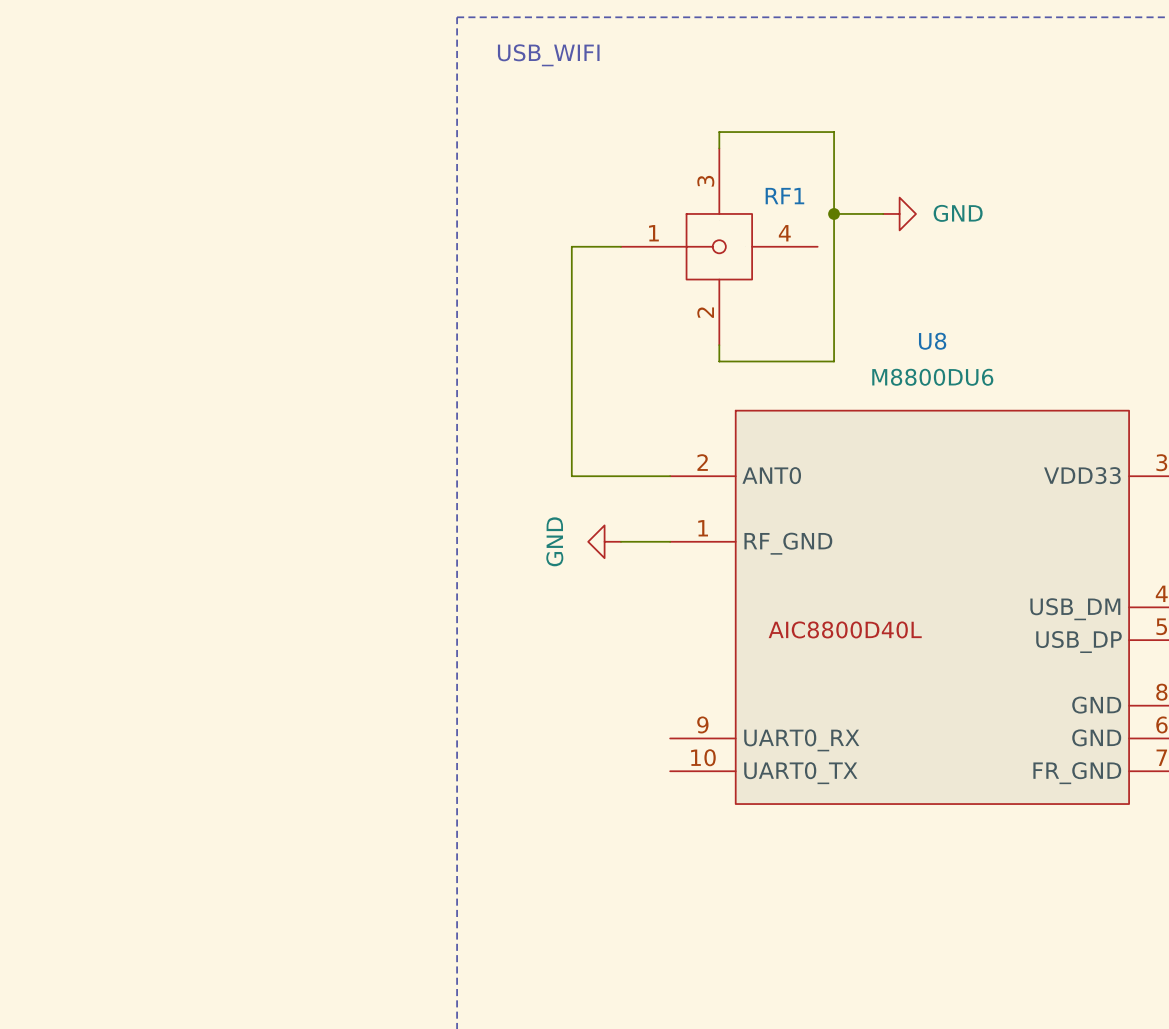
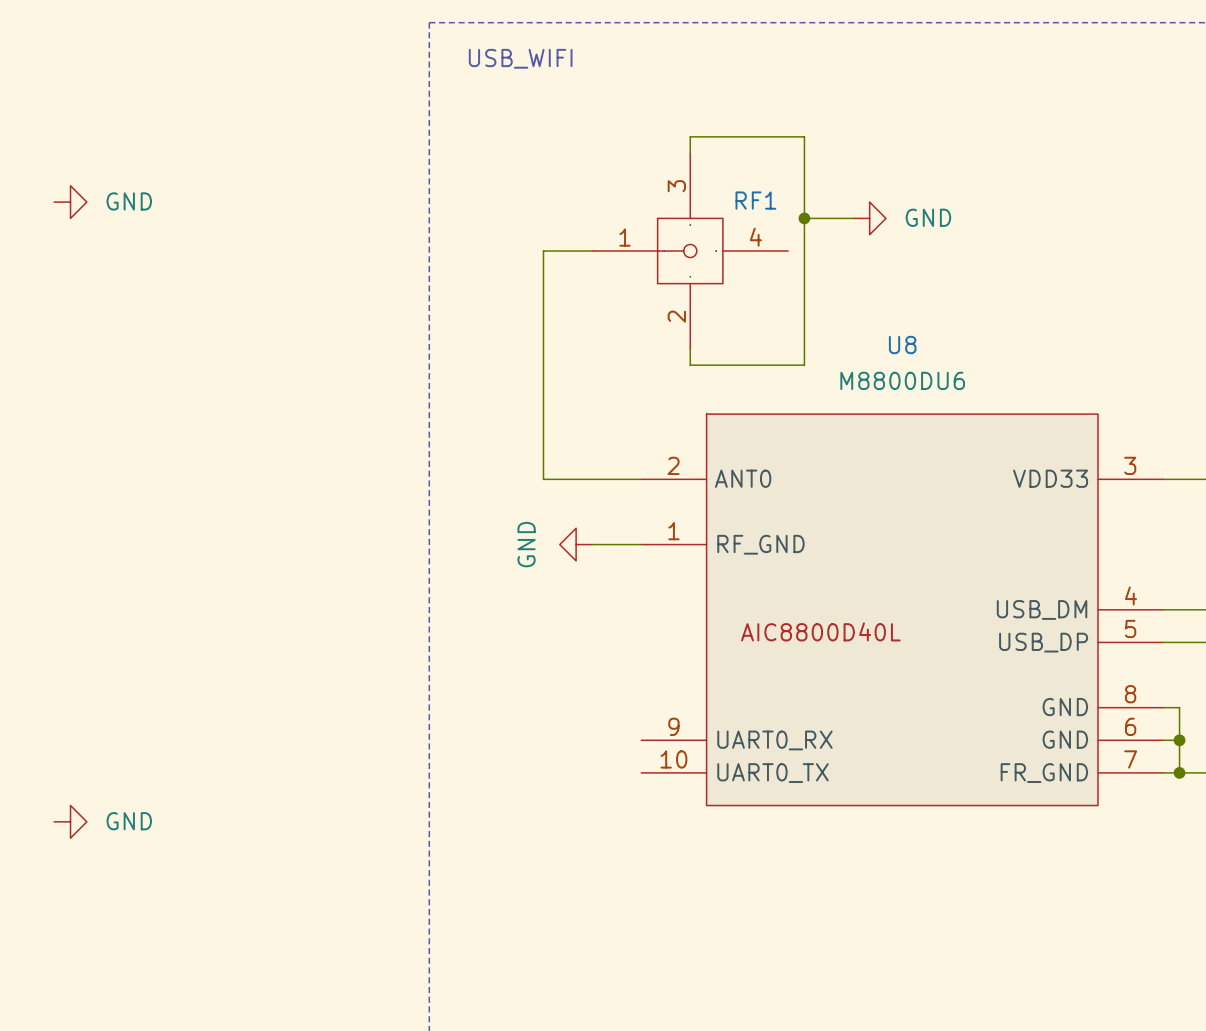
power symbol: none -> GND (70, 202)
power symbol: none -> GND (70, 821)

